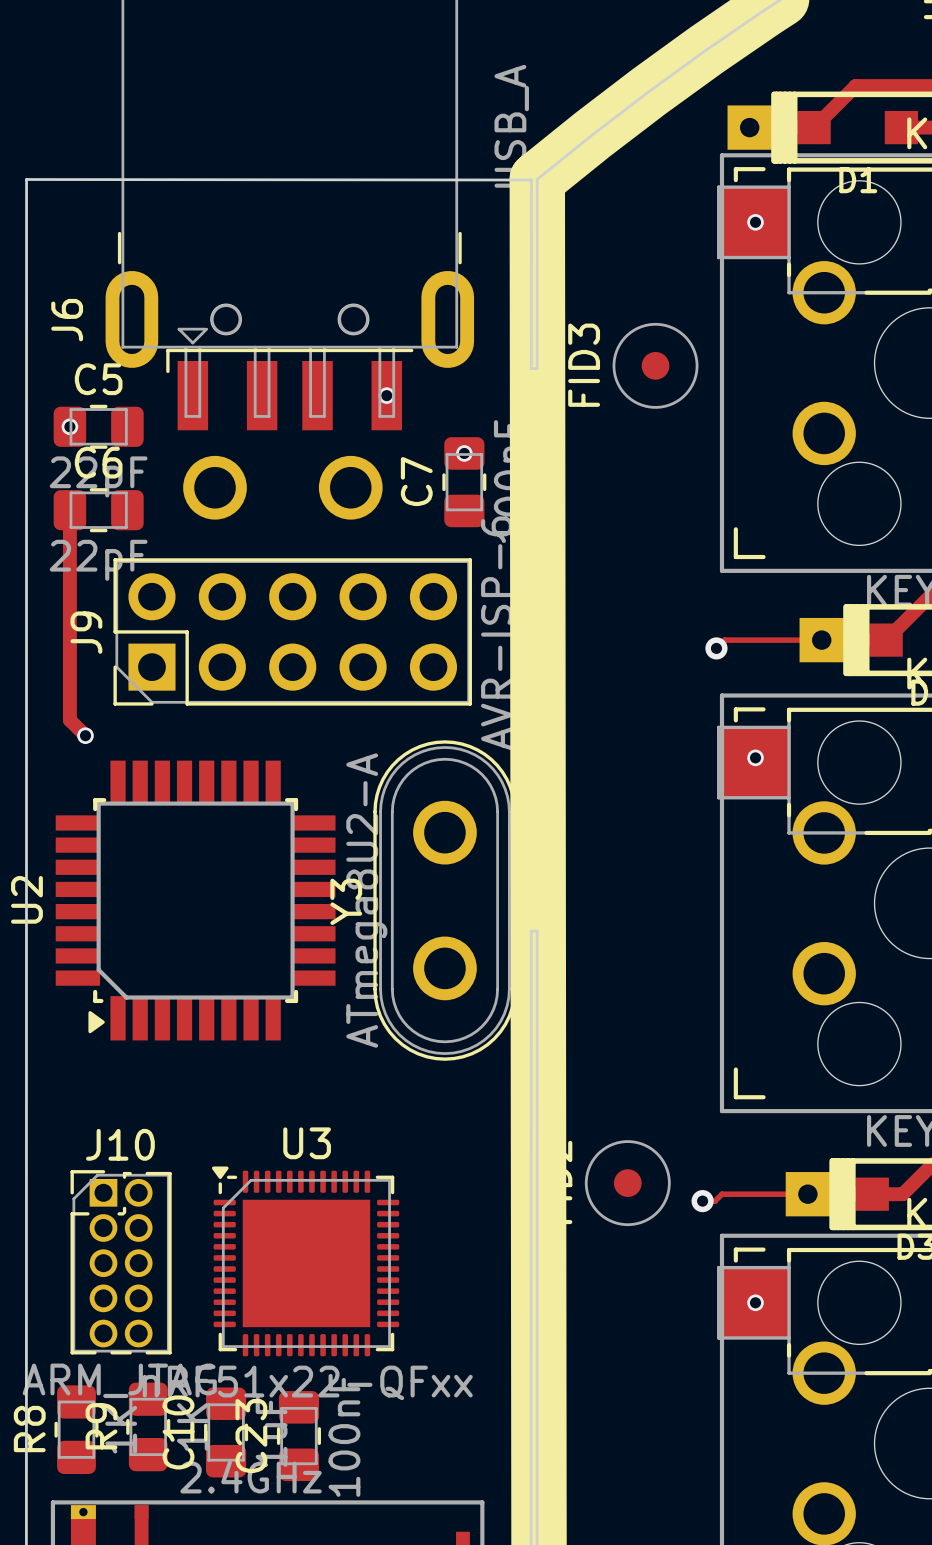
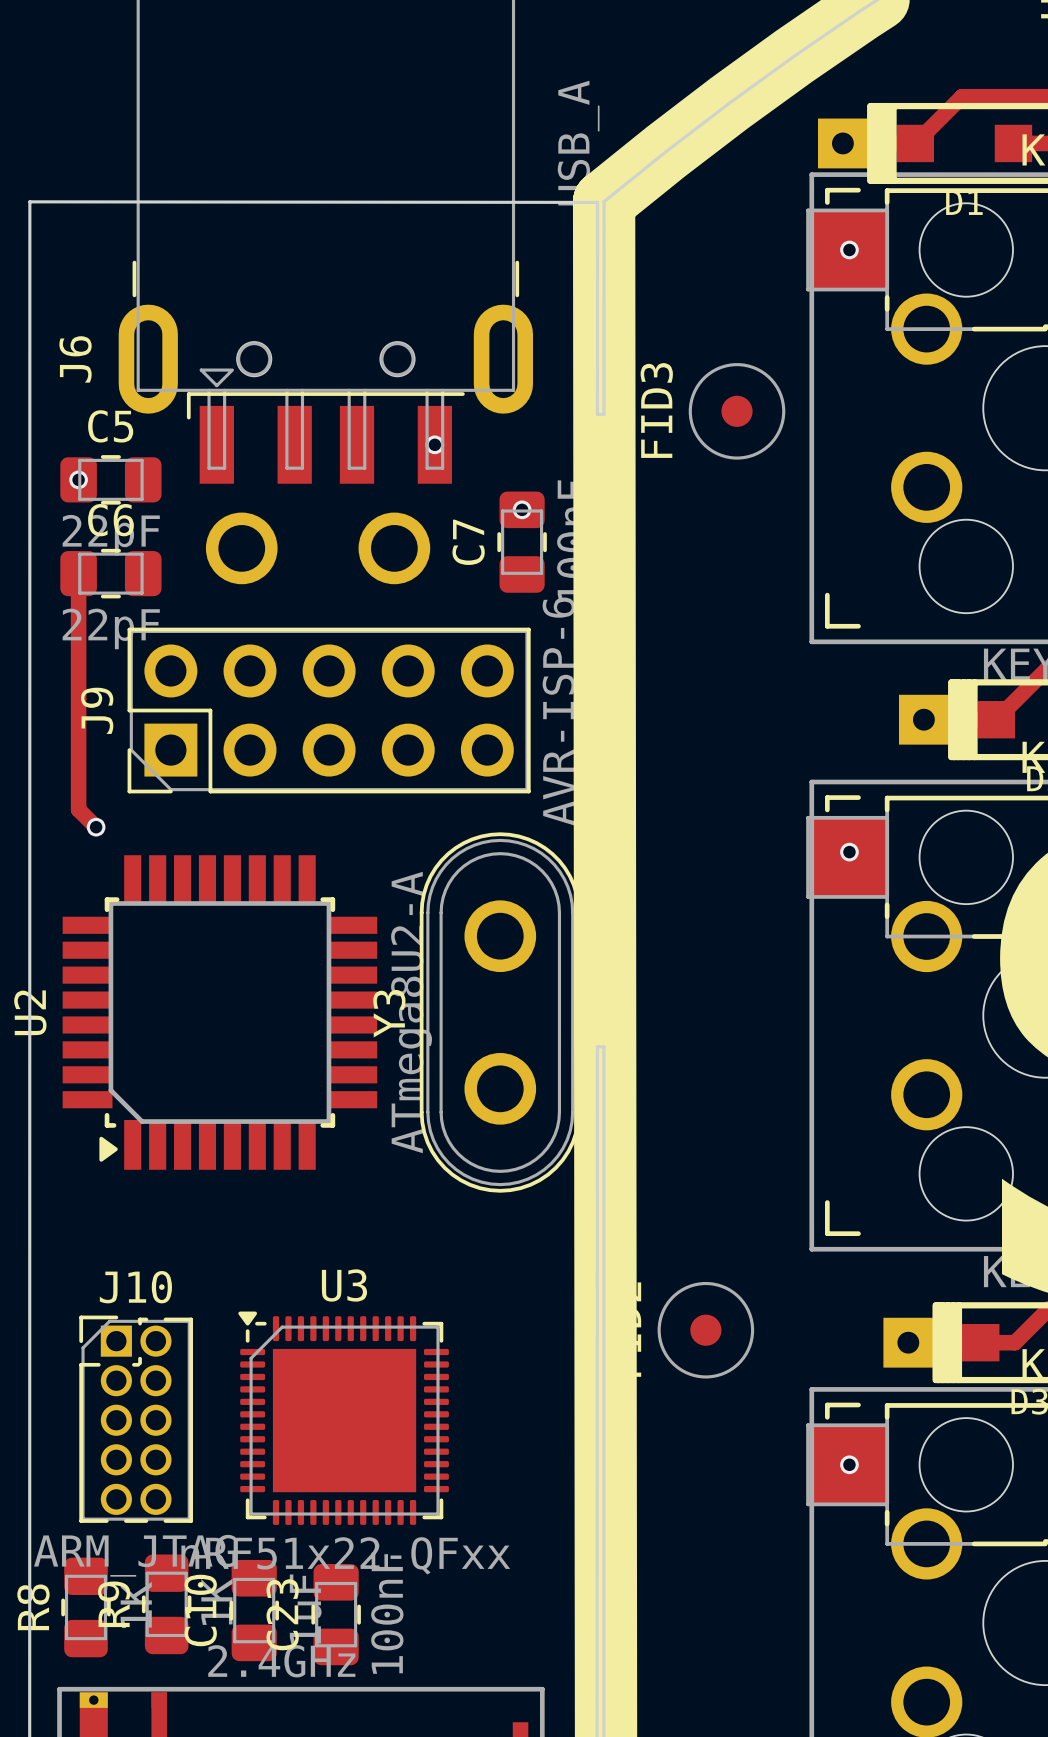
track: (821, 640) (724, 640) (716, 648) -> none
via: (716, 648) -> none
track: (807, 1194) (721, 1194) (715, 1201) (702, 1201) -> none
via: (702, 1201) -> none

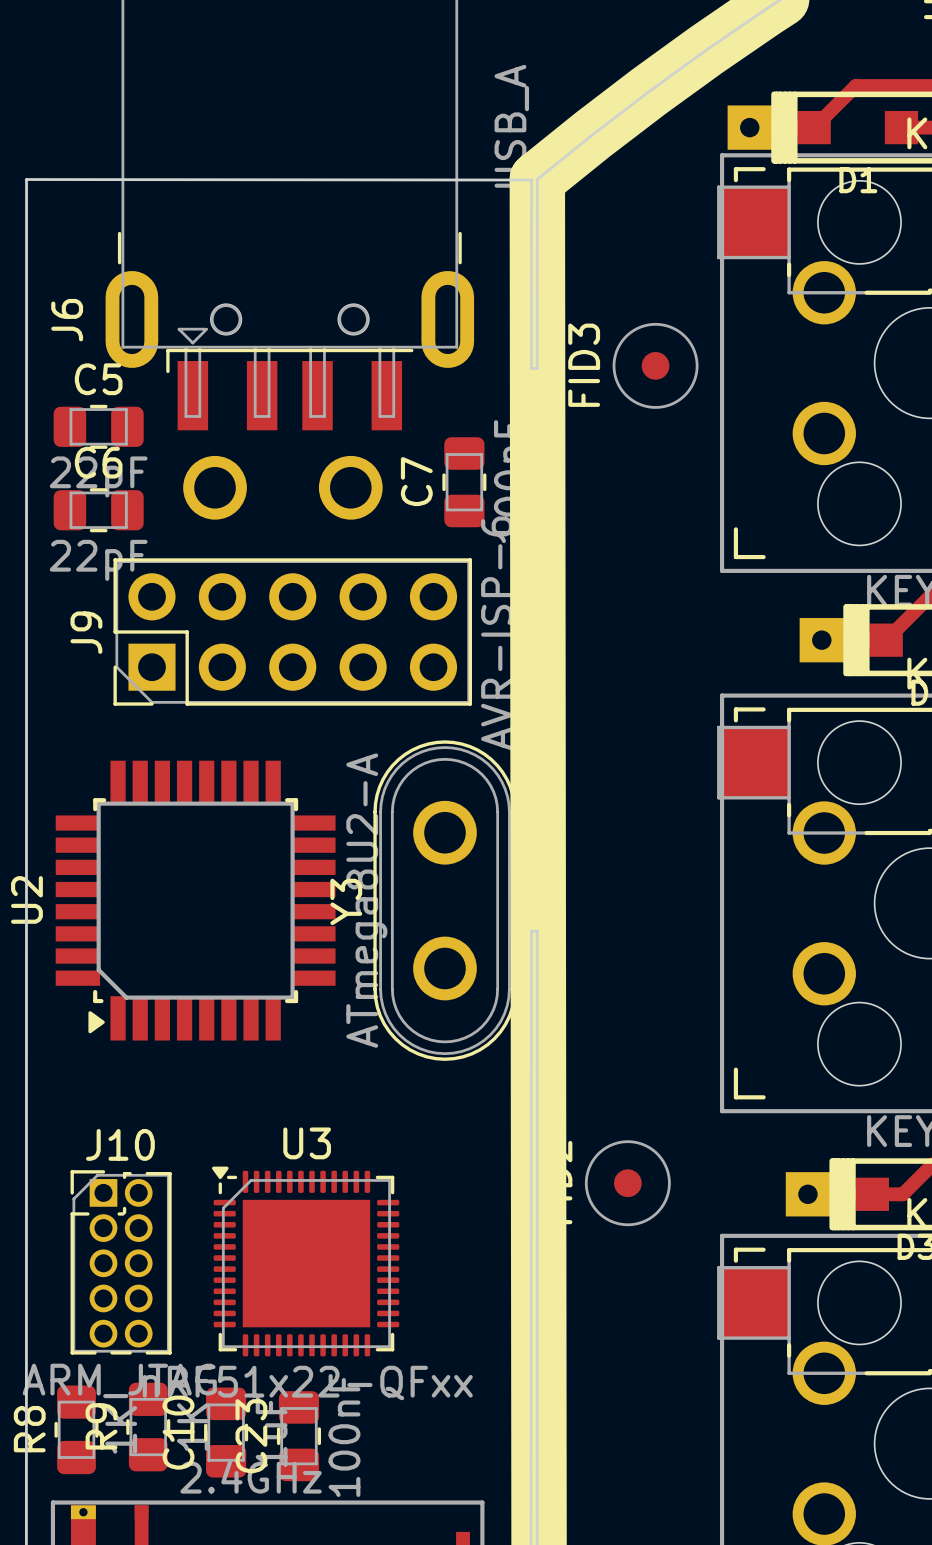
via: (849, 249) -> none
via: (434, 444) -> none
via: (78, 479) -> none
via: (522, 509) -> none
track: (78, 573) (78, 809) (96, 827) -> none
via: (96, 827) -> none
via: (849, 852) -> none
via: (849, 1464) -> none

